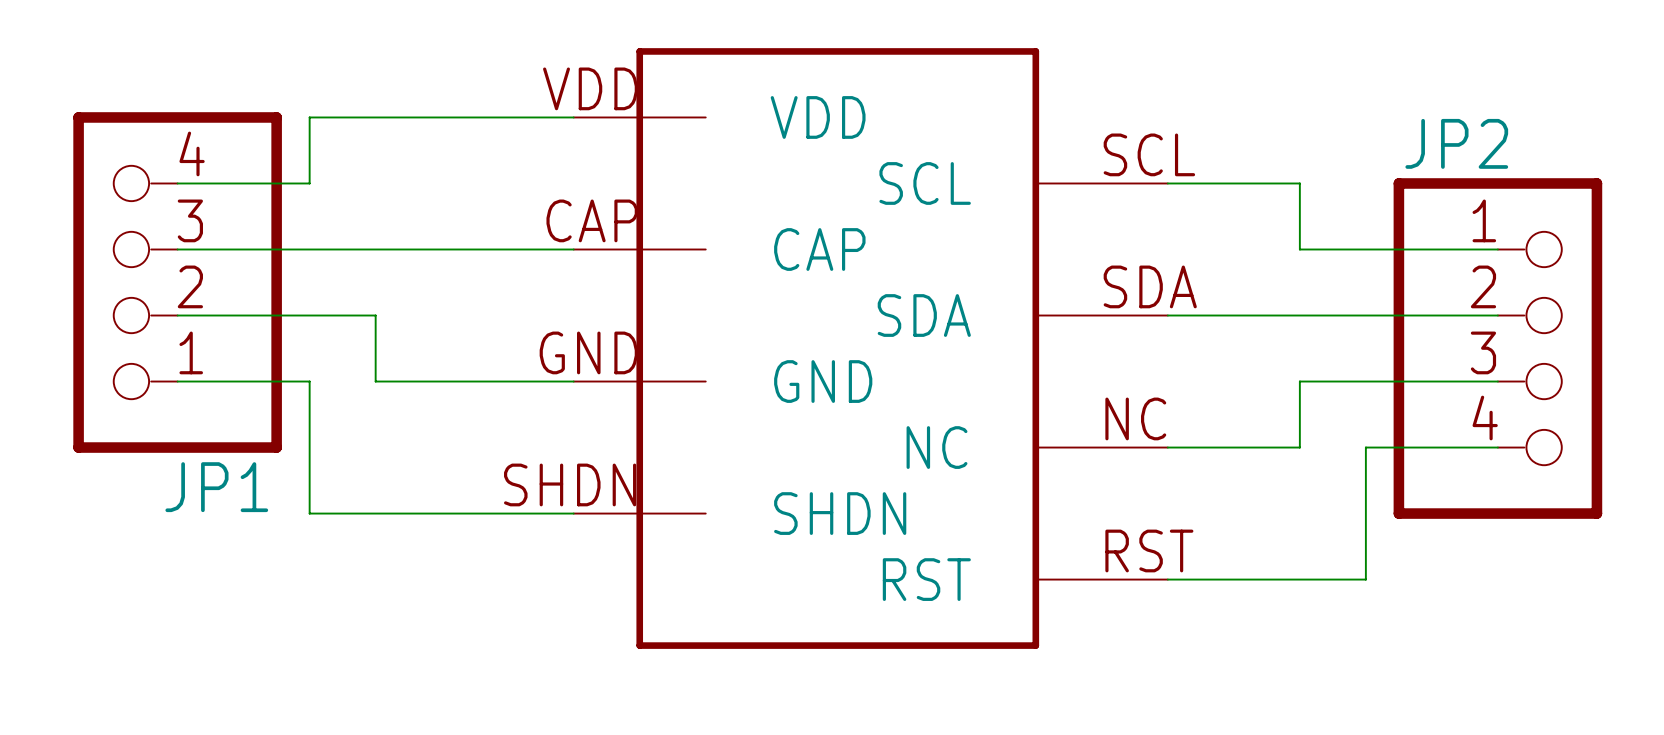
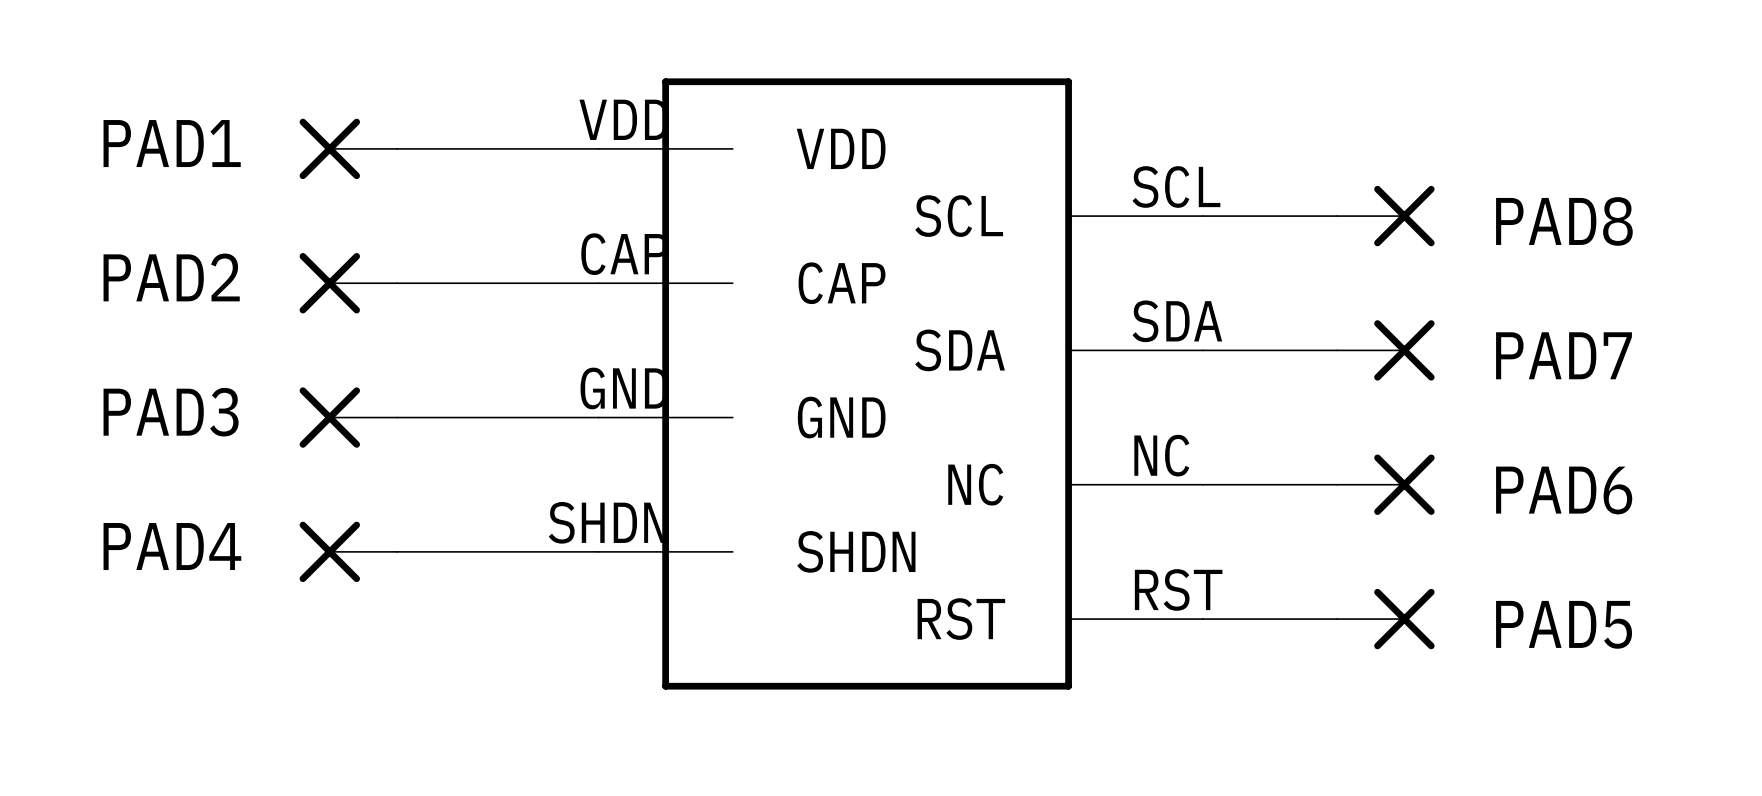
PAD1: none -> (348, 148)
wire: (375, 117) (309, 117) (309, 183) (177, 183) -> none
wire: (1299, 183) (1299, 249) (1497, 249) -> none
PAD8: none -> (1385, 216)
wire: (177, 249) (375, 249) -> none
PAD2: none -> (348, 283)
JP1: (177, 282) -> none
wire: (177, 315) (375, 315) (375, 381) -> none
wire: (1299, 315) (1497, 315) -> none
PAD7: none -> (1385, 350)
JP2: (1497, 348) -> none
wire: (177, 381) (309, 381) (309, 513) (375, 513) -> none
PAD3: none -> (348, 417)
wire: (1497, 381) (1299, 381) (1299, 447) -> none
PAD6: none -> (1385, 484)
wire: (1497, 447) (1365, 447) (1365, 579) (1299, 579) -> none
PAD4: none -> (348, 551)
PAD5: none -> (1385, 619)

